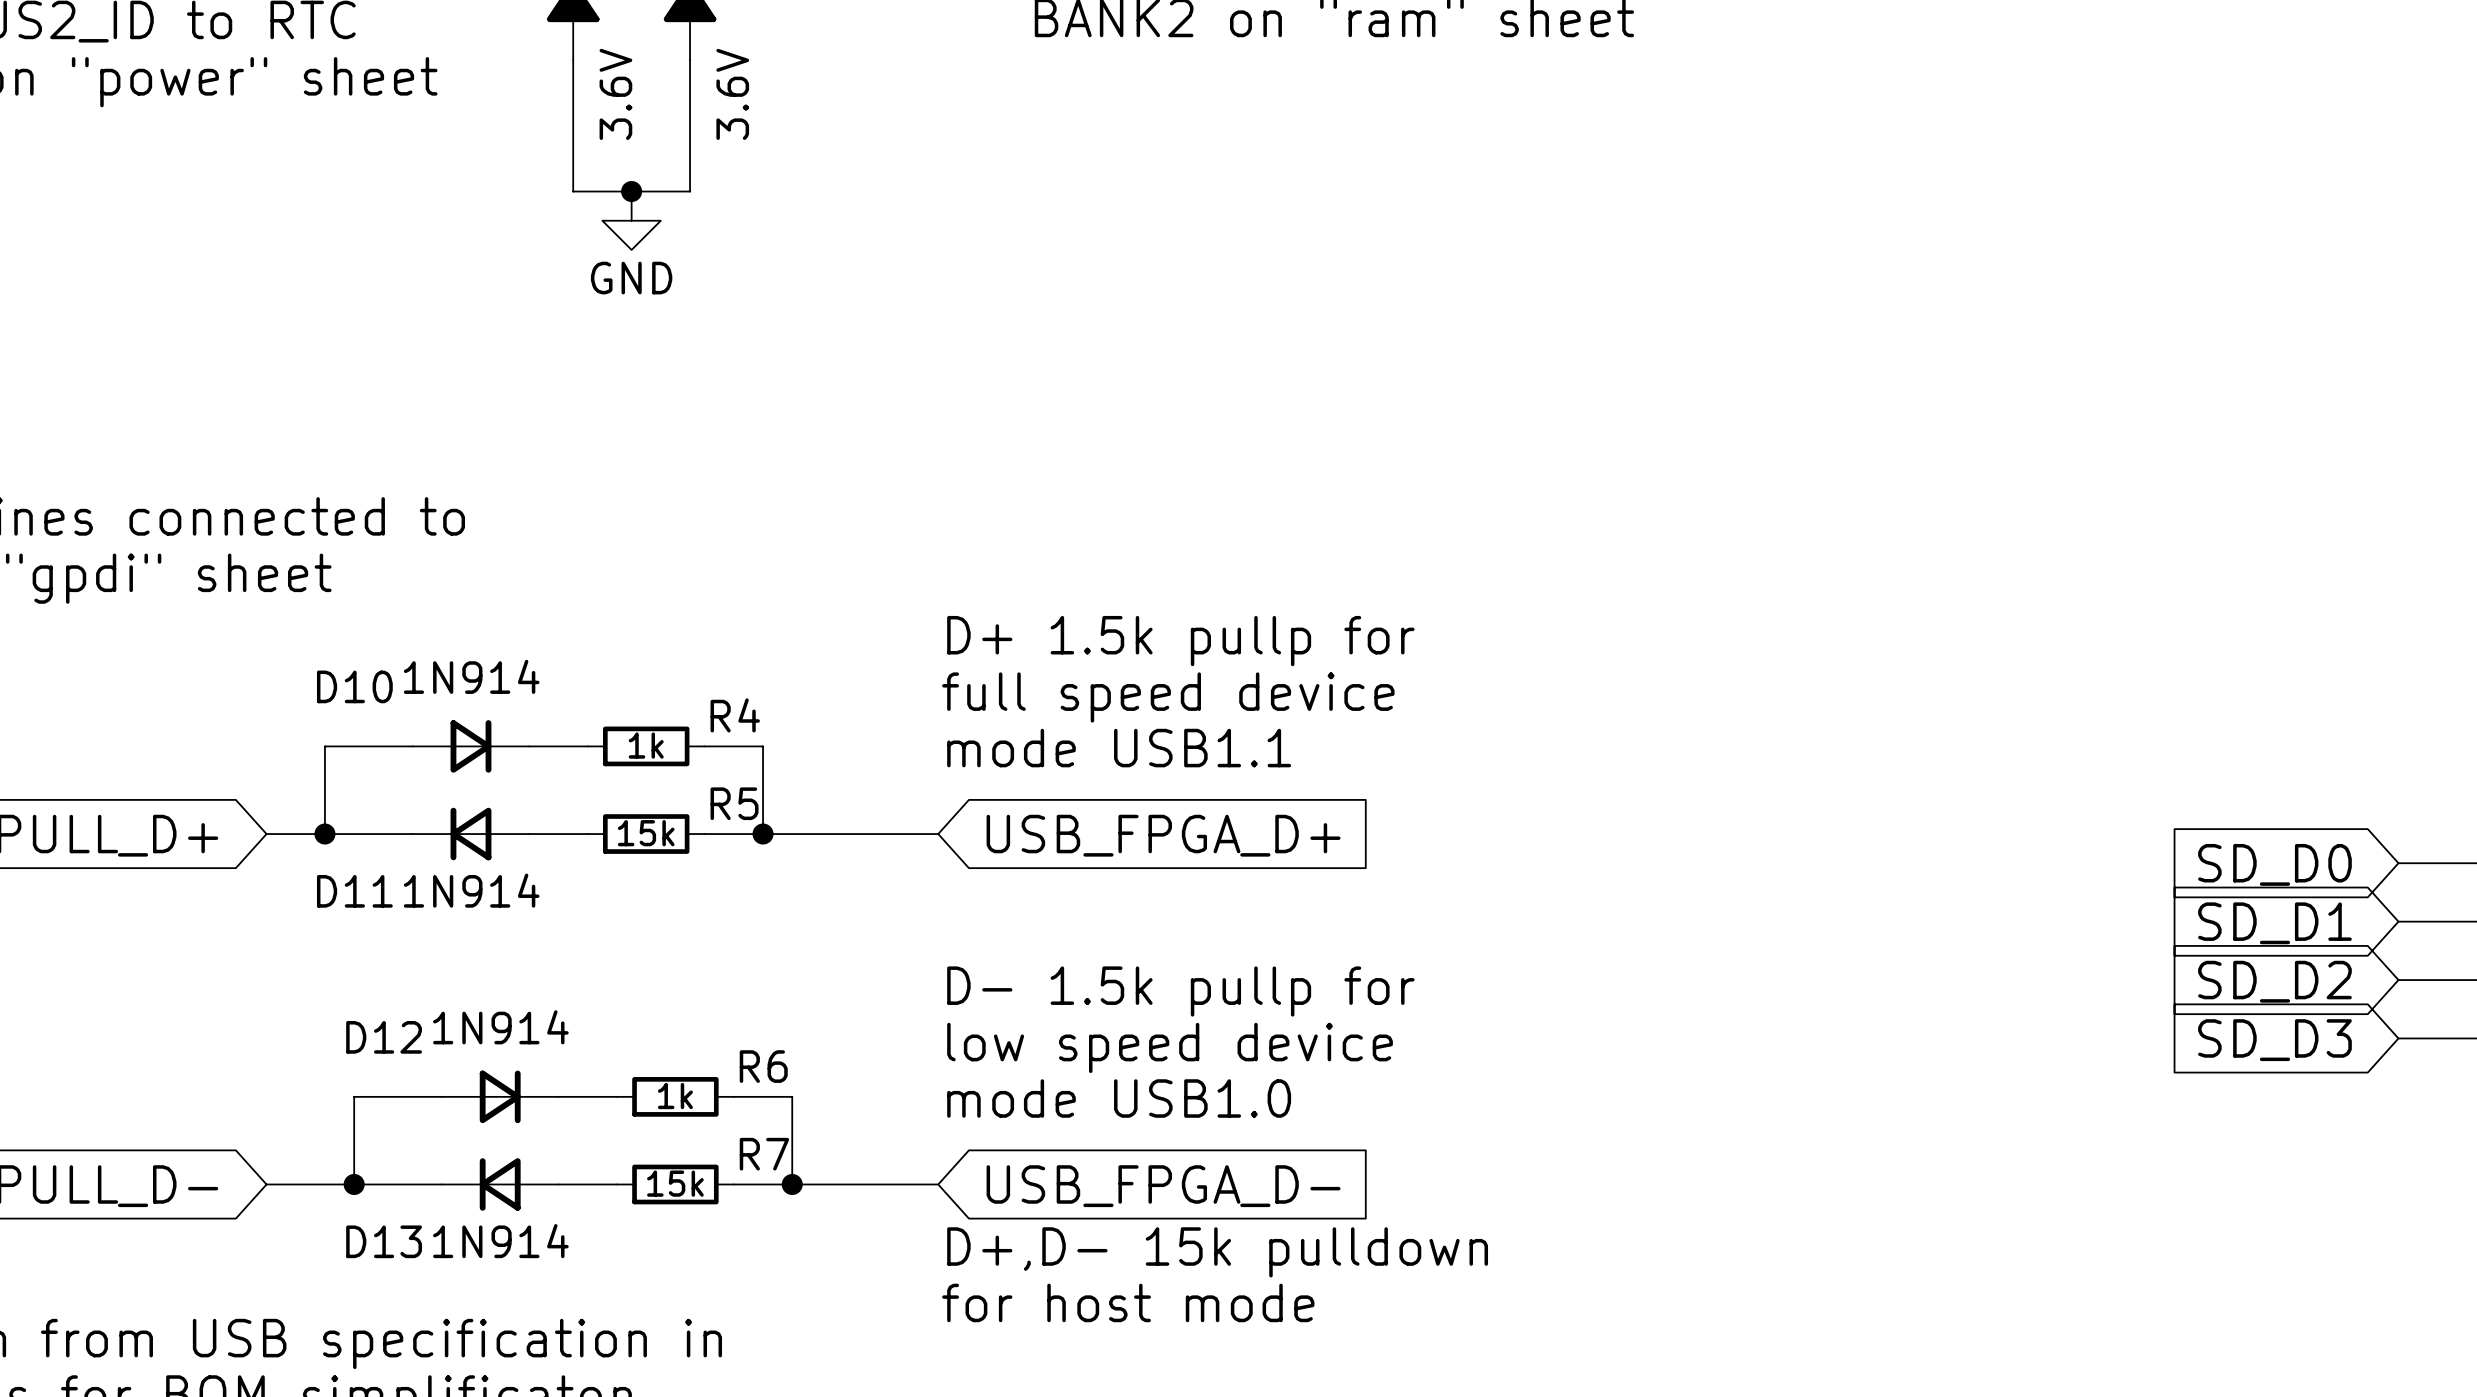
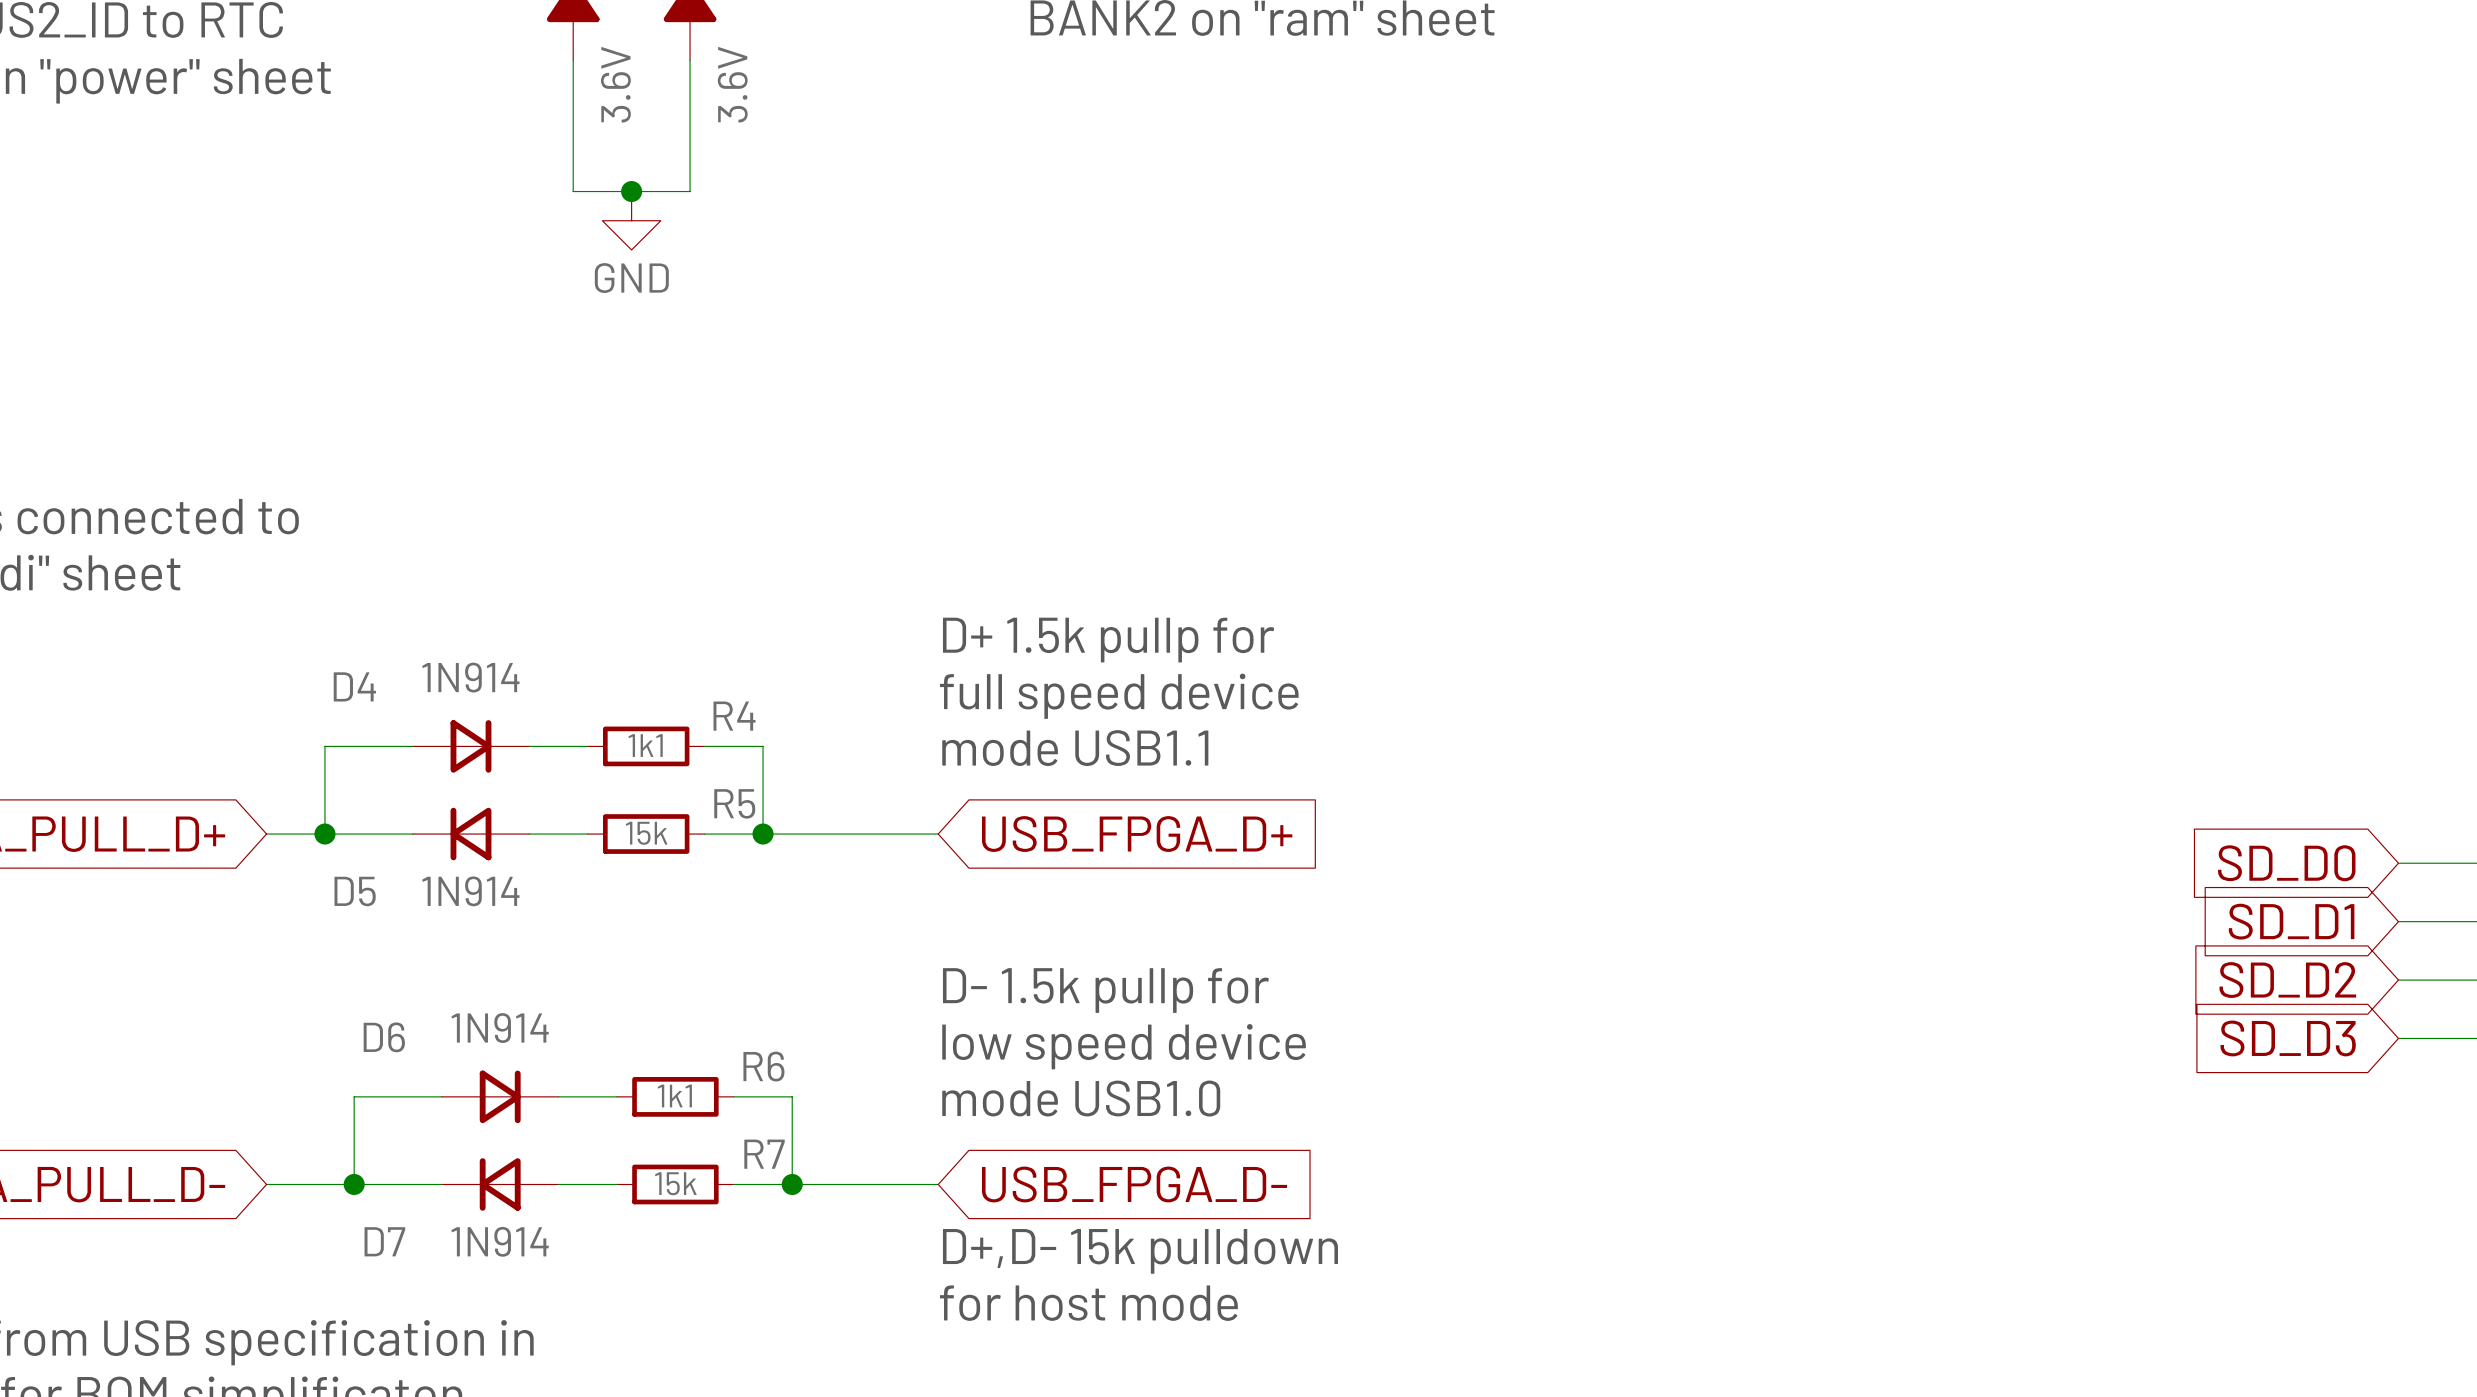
D10 name: D10 (354, 686) -> D4 (354, 686)
R4 value: 1k (646, 745) -> 1k1 (645, 745)
D11 name: D11 (354, 891) -> D5 (355, 891)
D12 name: D12 (384, 1037) -> D6 (384, 1037)
R6 value: 1k (675, 1096) -> 1k1 (674, 1096)
D13 name: D13 (384, 1241) -> D7 (384, 1241)

